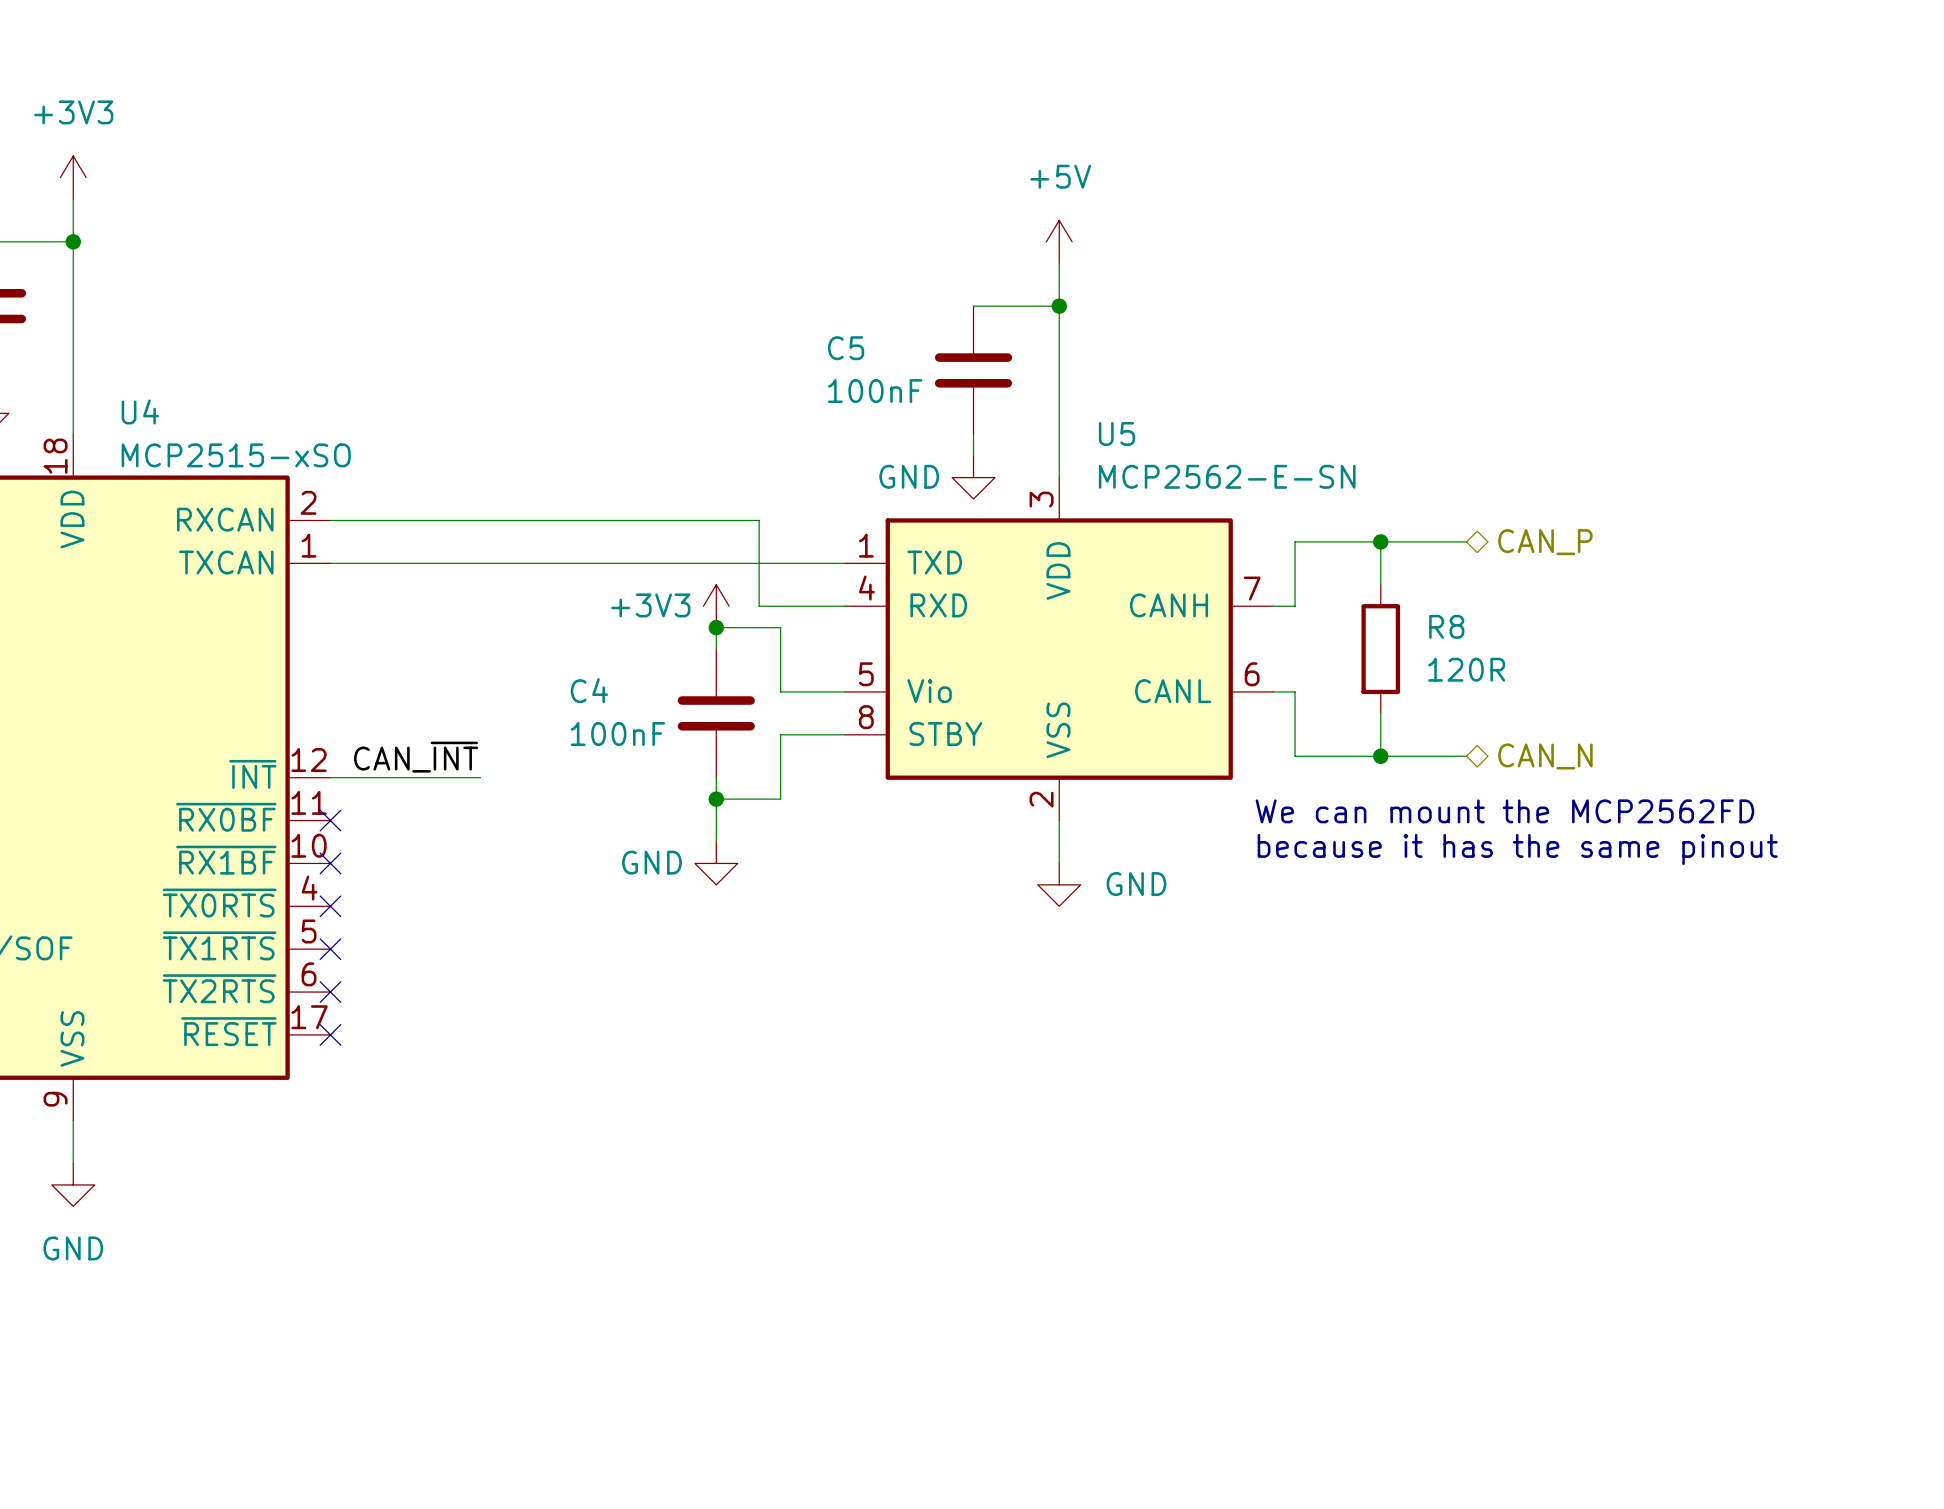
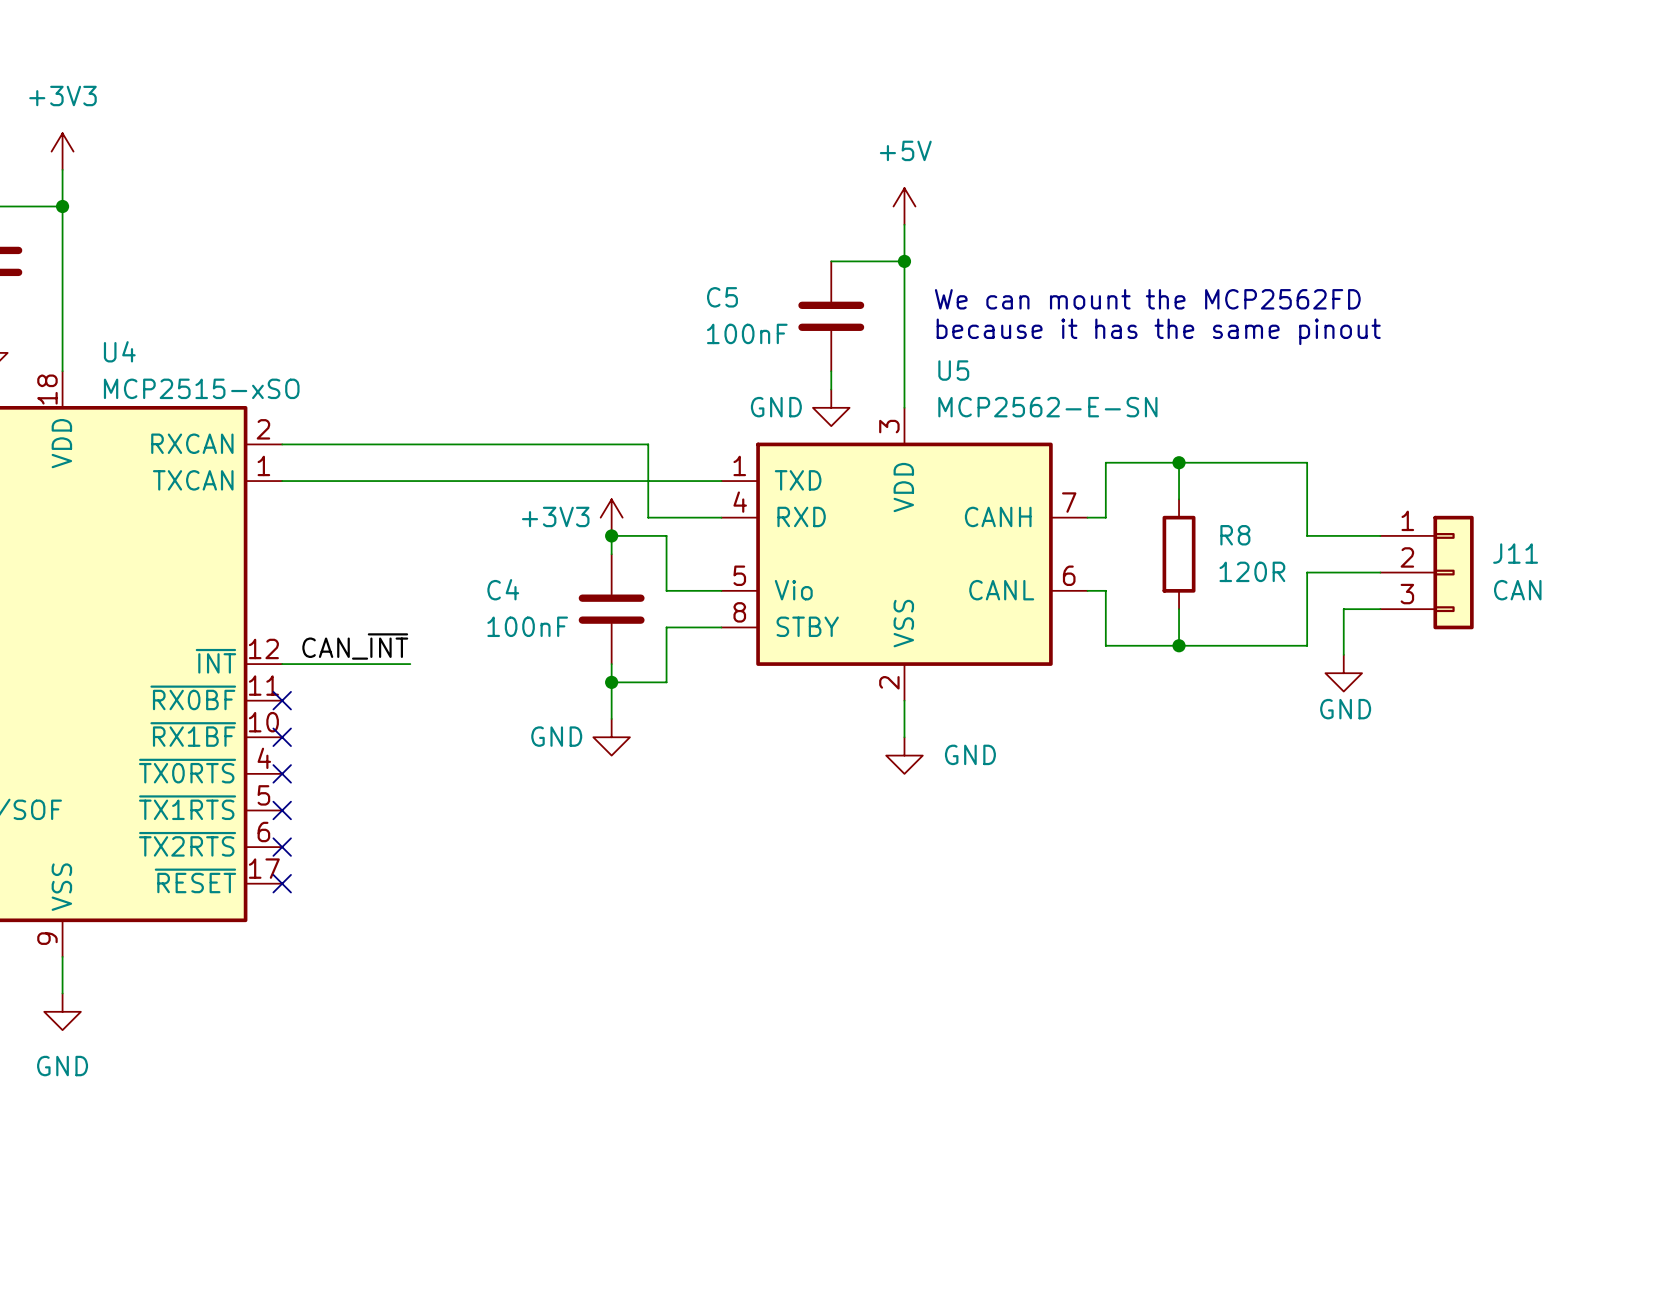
text: none -> We can mount the MCP2562FD (1147, 299)
text: none -> because it has the same pinout (1158, 331)
wire: none -> (1252, 462) (1307, 462) (1307, 535) (1380, 535)
hierarchical label: CAN_P (1545, 542) -> none
wire: none -> (1380, 572) (1307, 572) (1307, 645) (1252, 645)
J11: none -> CAN (1427, 572)
wire: none -> (1380, 609) (1343, 609) (1343, 654)
hierarchical label: CAN_N (1545, 756) -> none
power symbol: none -> GND (1343, 673)
text: We can mount the MCP2562FD (1504, 811) -> none
text: because it has the same pinout (1517, 849) -> none

